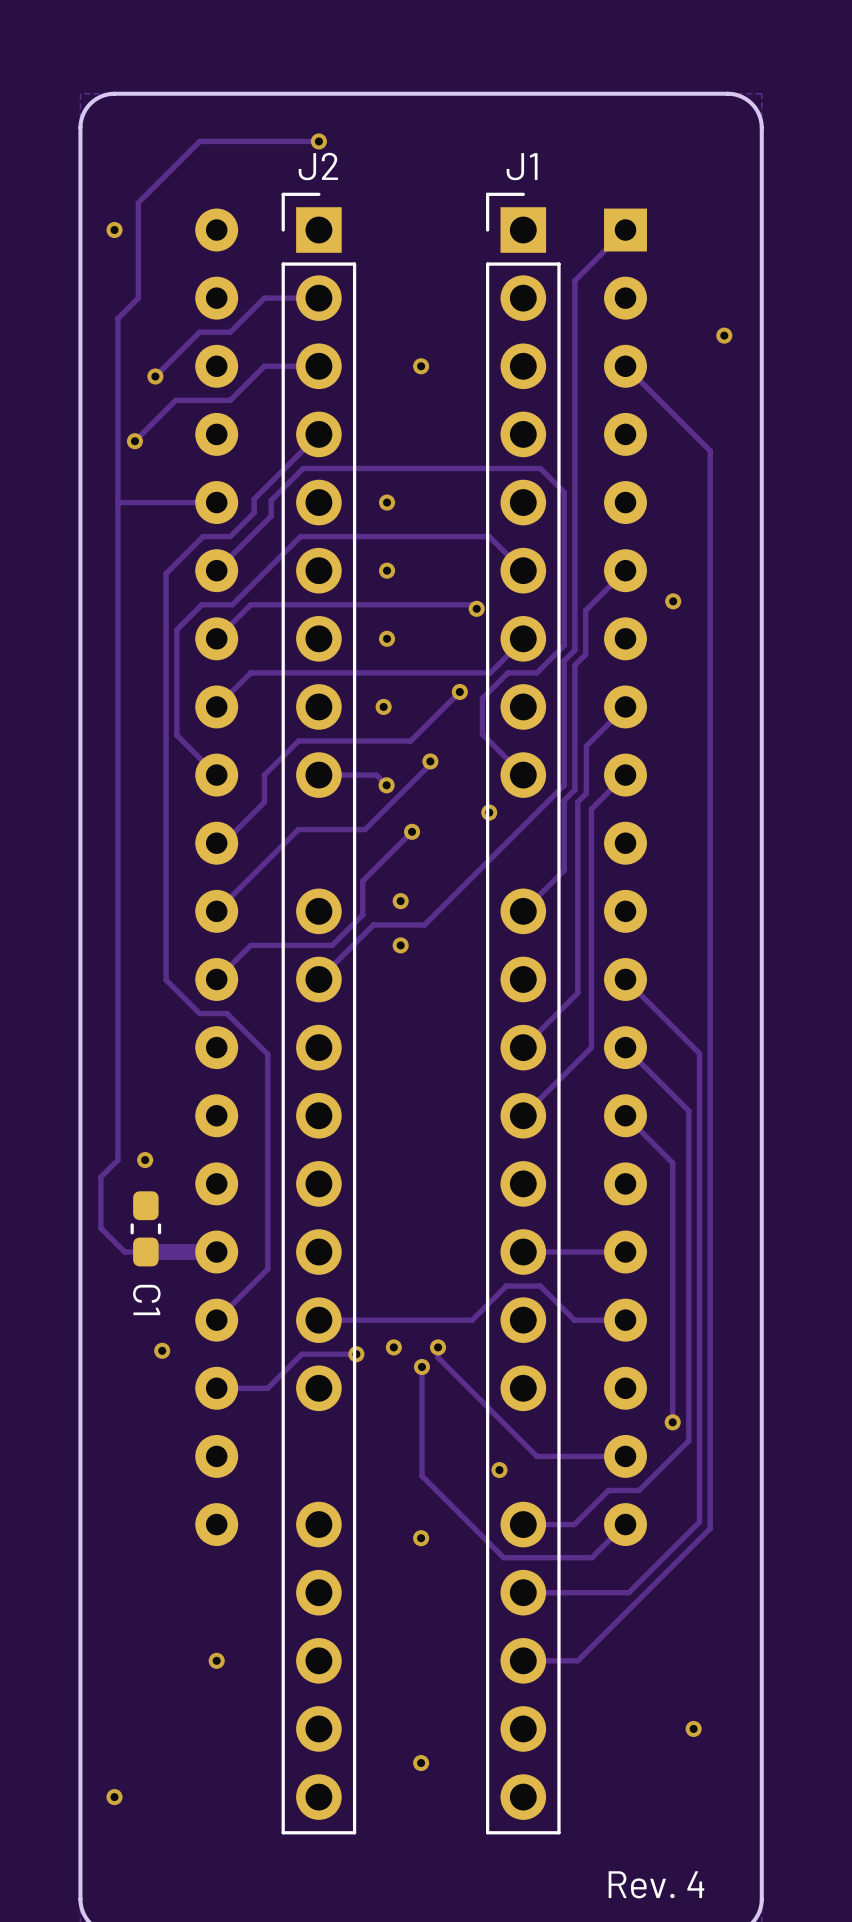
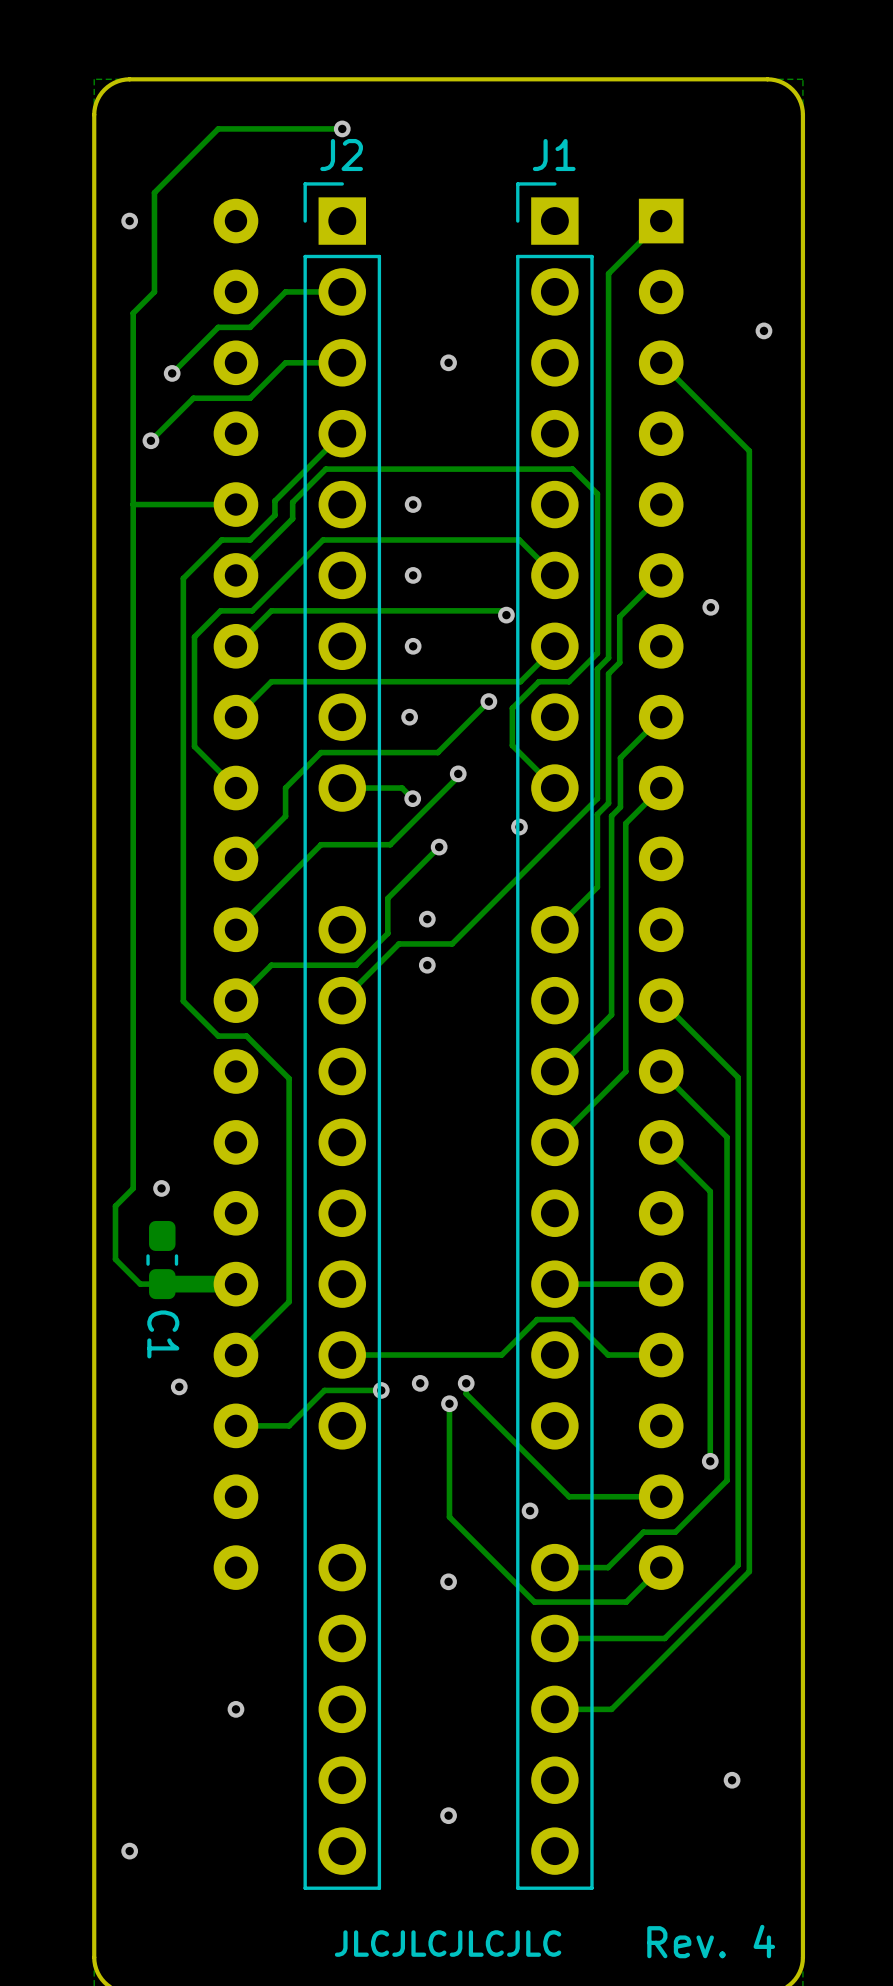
text: none -> JLCJLCJLCJLC (448, 1943)

